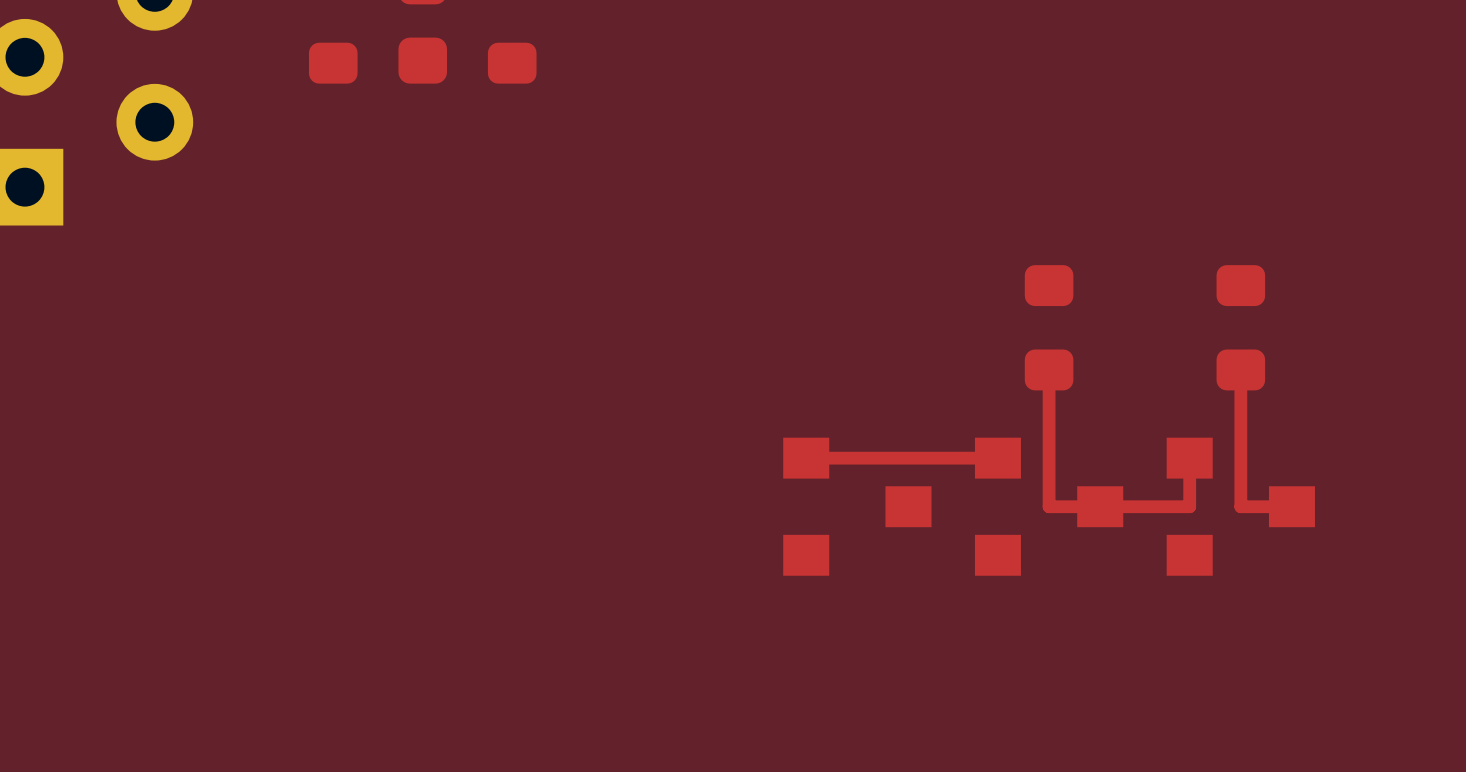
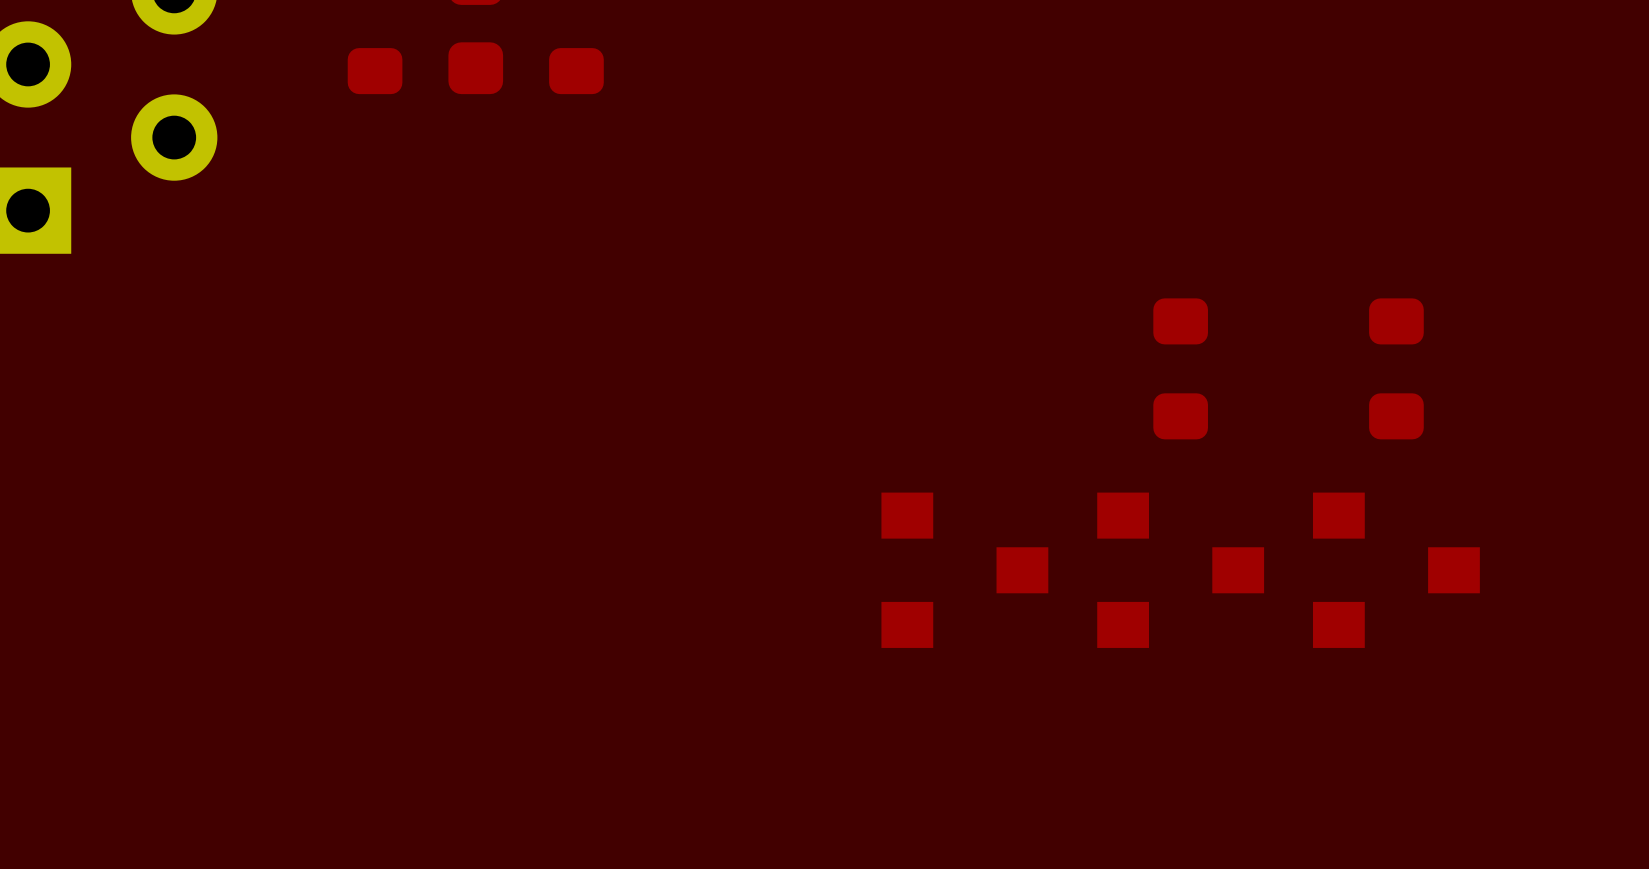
top track: (1049, 369) (1049, 506) (1189, 506) (1189, 458) -> none
top track: (1240, 369) (1240, 506) (1291, 506) -> none
top track: (997, 458) (806, 458) -> none

